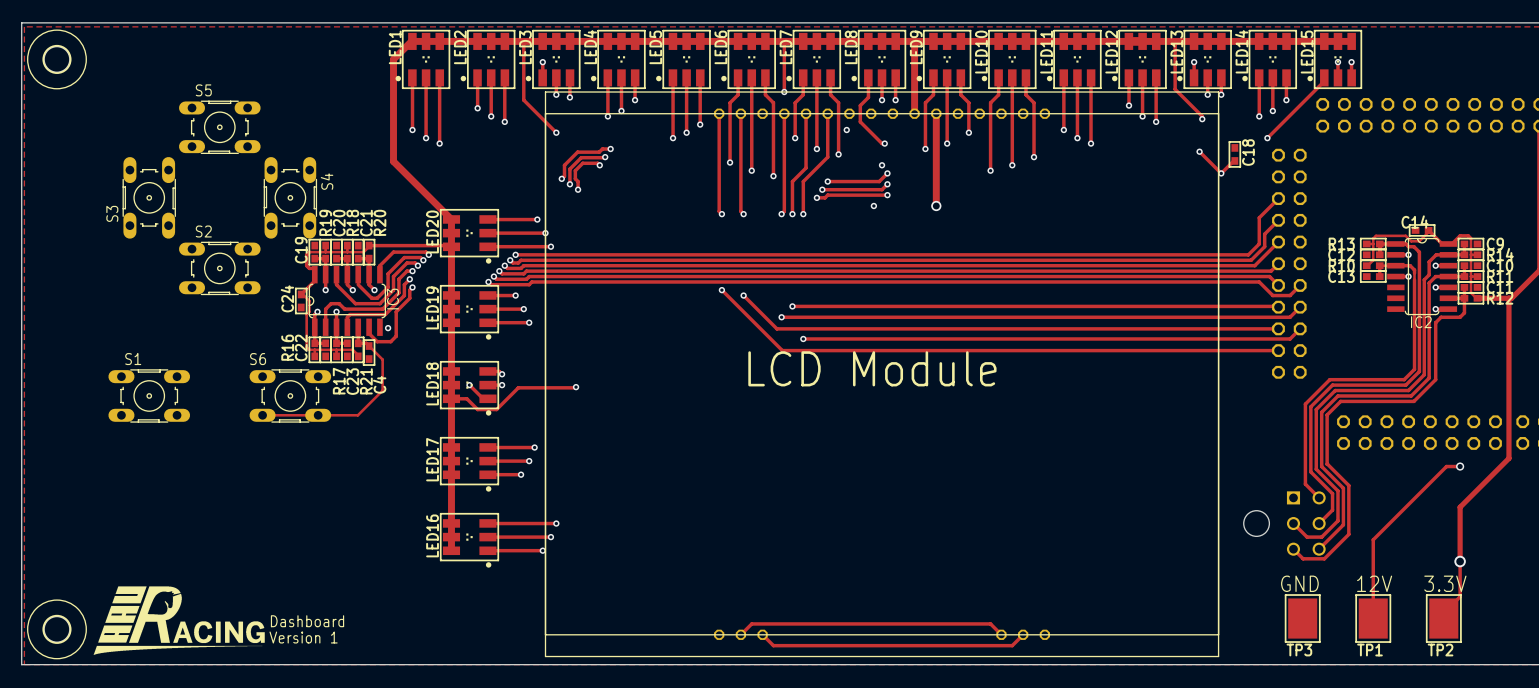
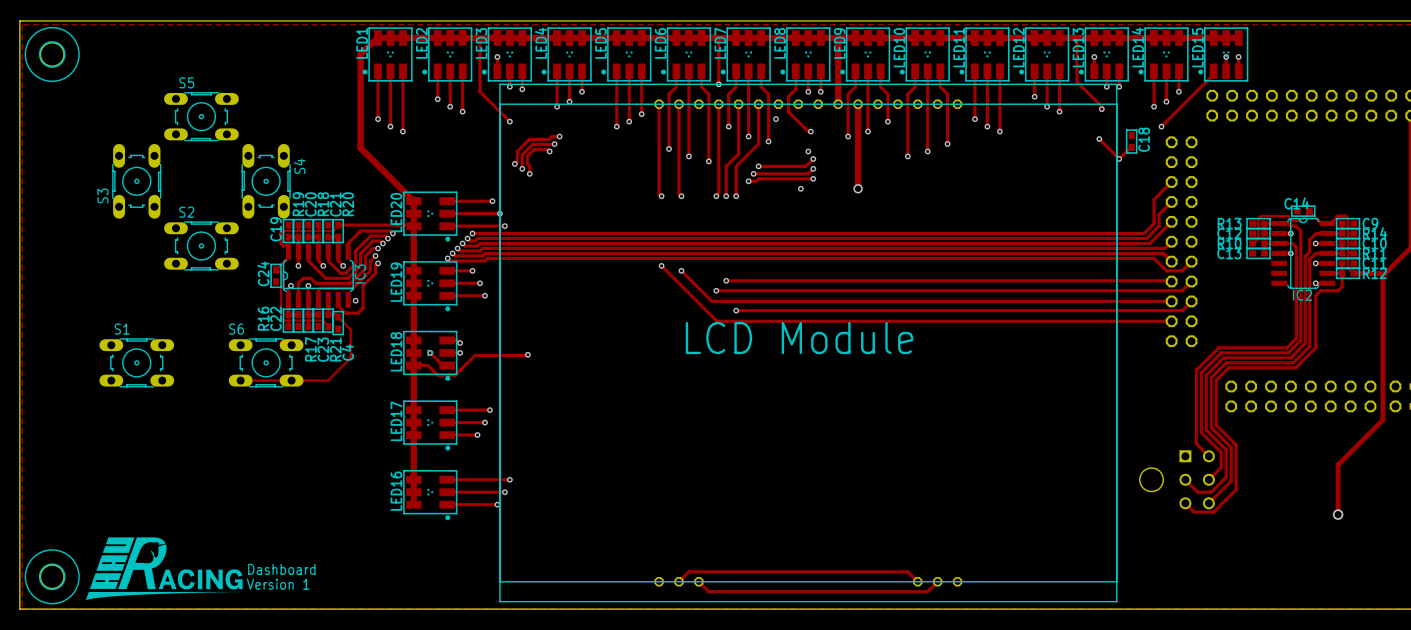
track: (1460, 466) (1446, 466) (1373, 539) (1373, 618) -> none
via: (1460, 466) -> none
track: (1460, 561) (1460, 596) (1443, 613) (1443, 618) -> none
text: GND (1299, 583) -> none
text: 12V (1374, 583) -> none
text: 3.3V (1445, 583) -> none
TP3: (1302, 618) -> none
TP1: (1373, 618) -> none
TP2: (1443, 618) -> none

